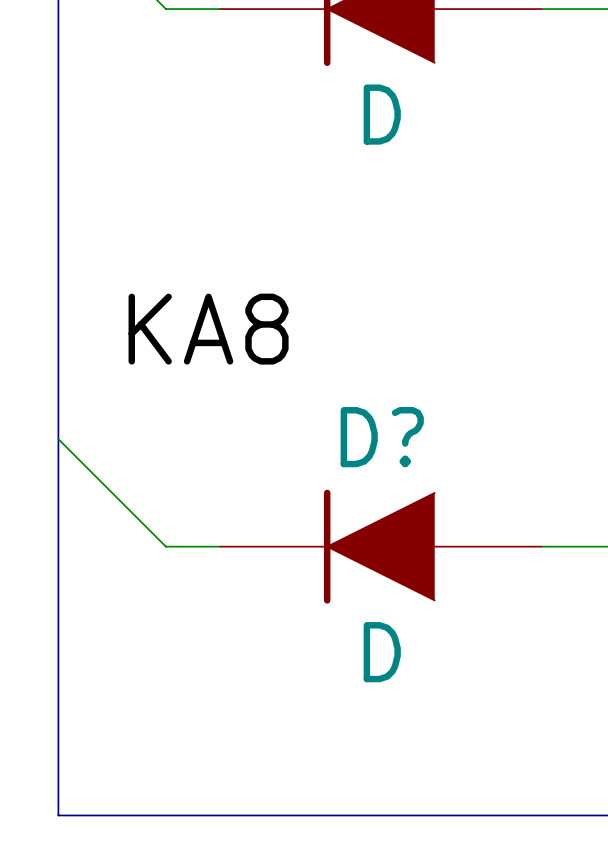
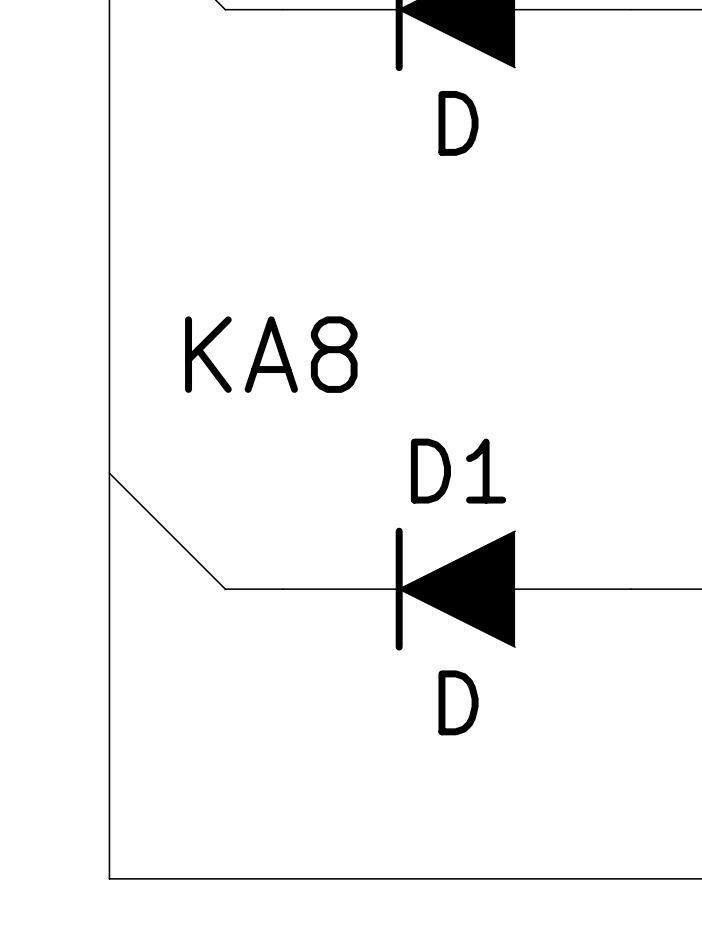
D? name: D? (382, 437) -> D1 (458, 471)

